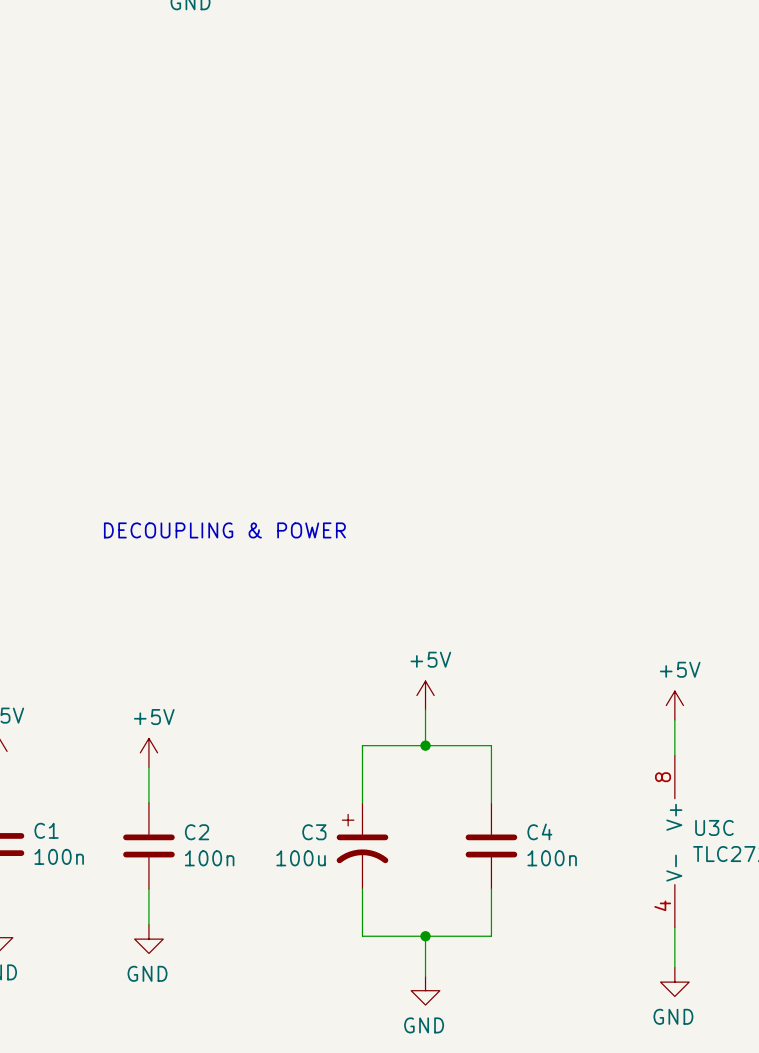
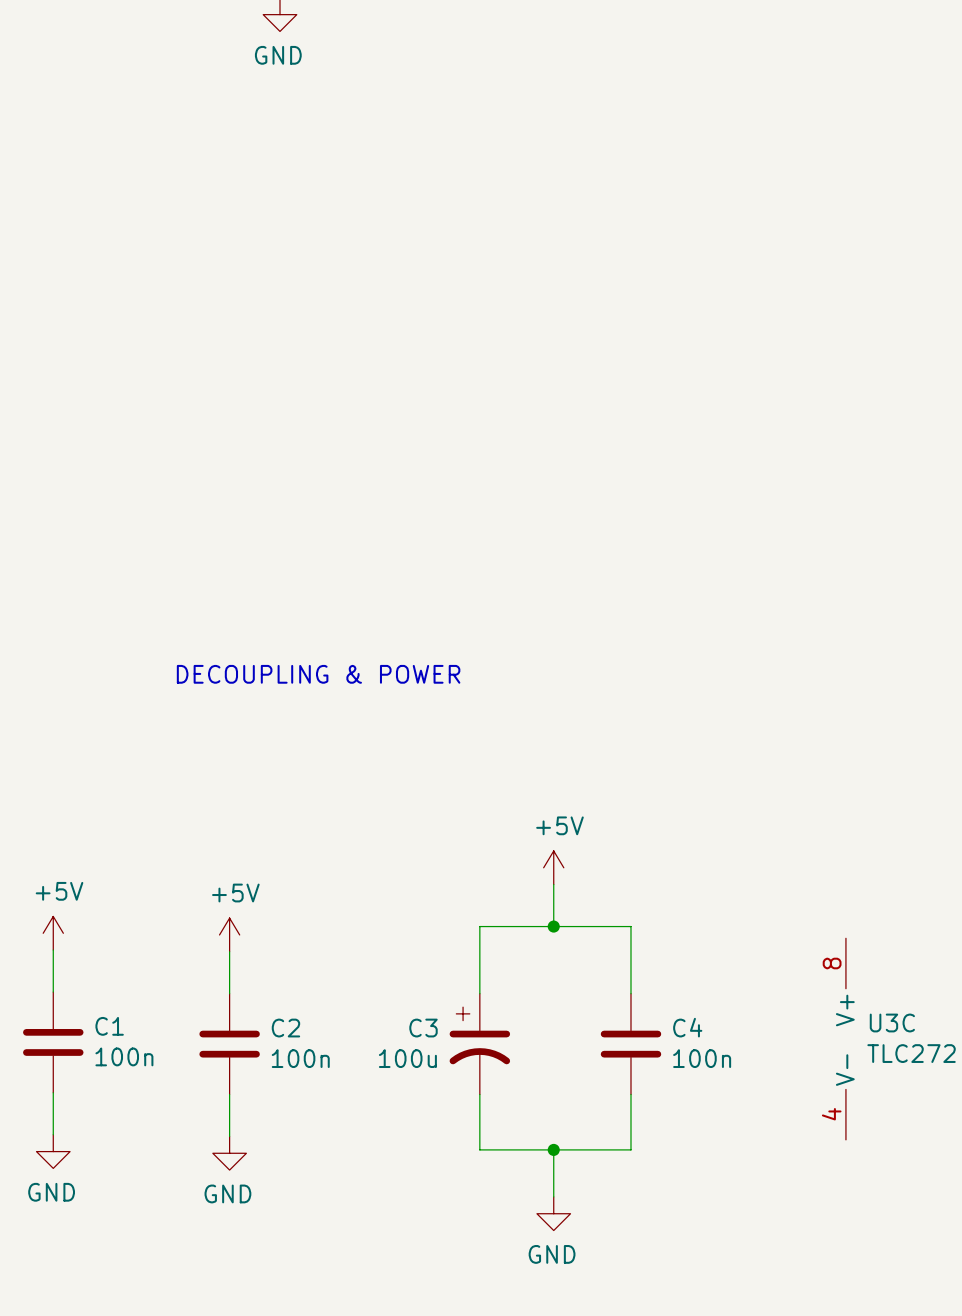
power symbol: +5V (674, 705) -> none
wire: (674, 719) (674, 755) -> none
wire: (674, 927) (674, 967) -> none
power symbol: GND (674, 982) -> none

